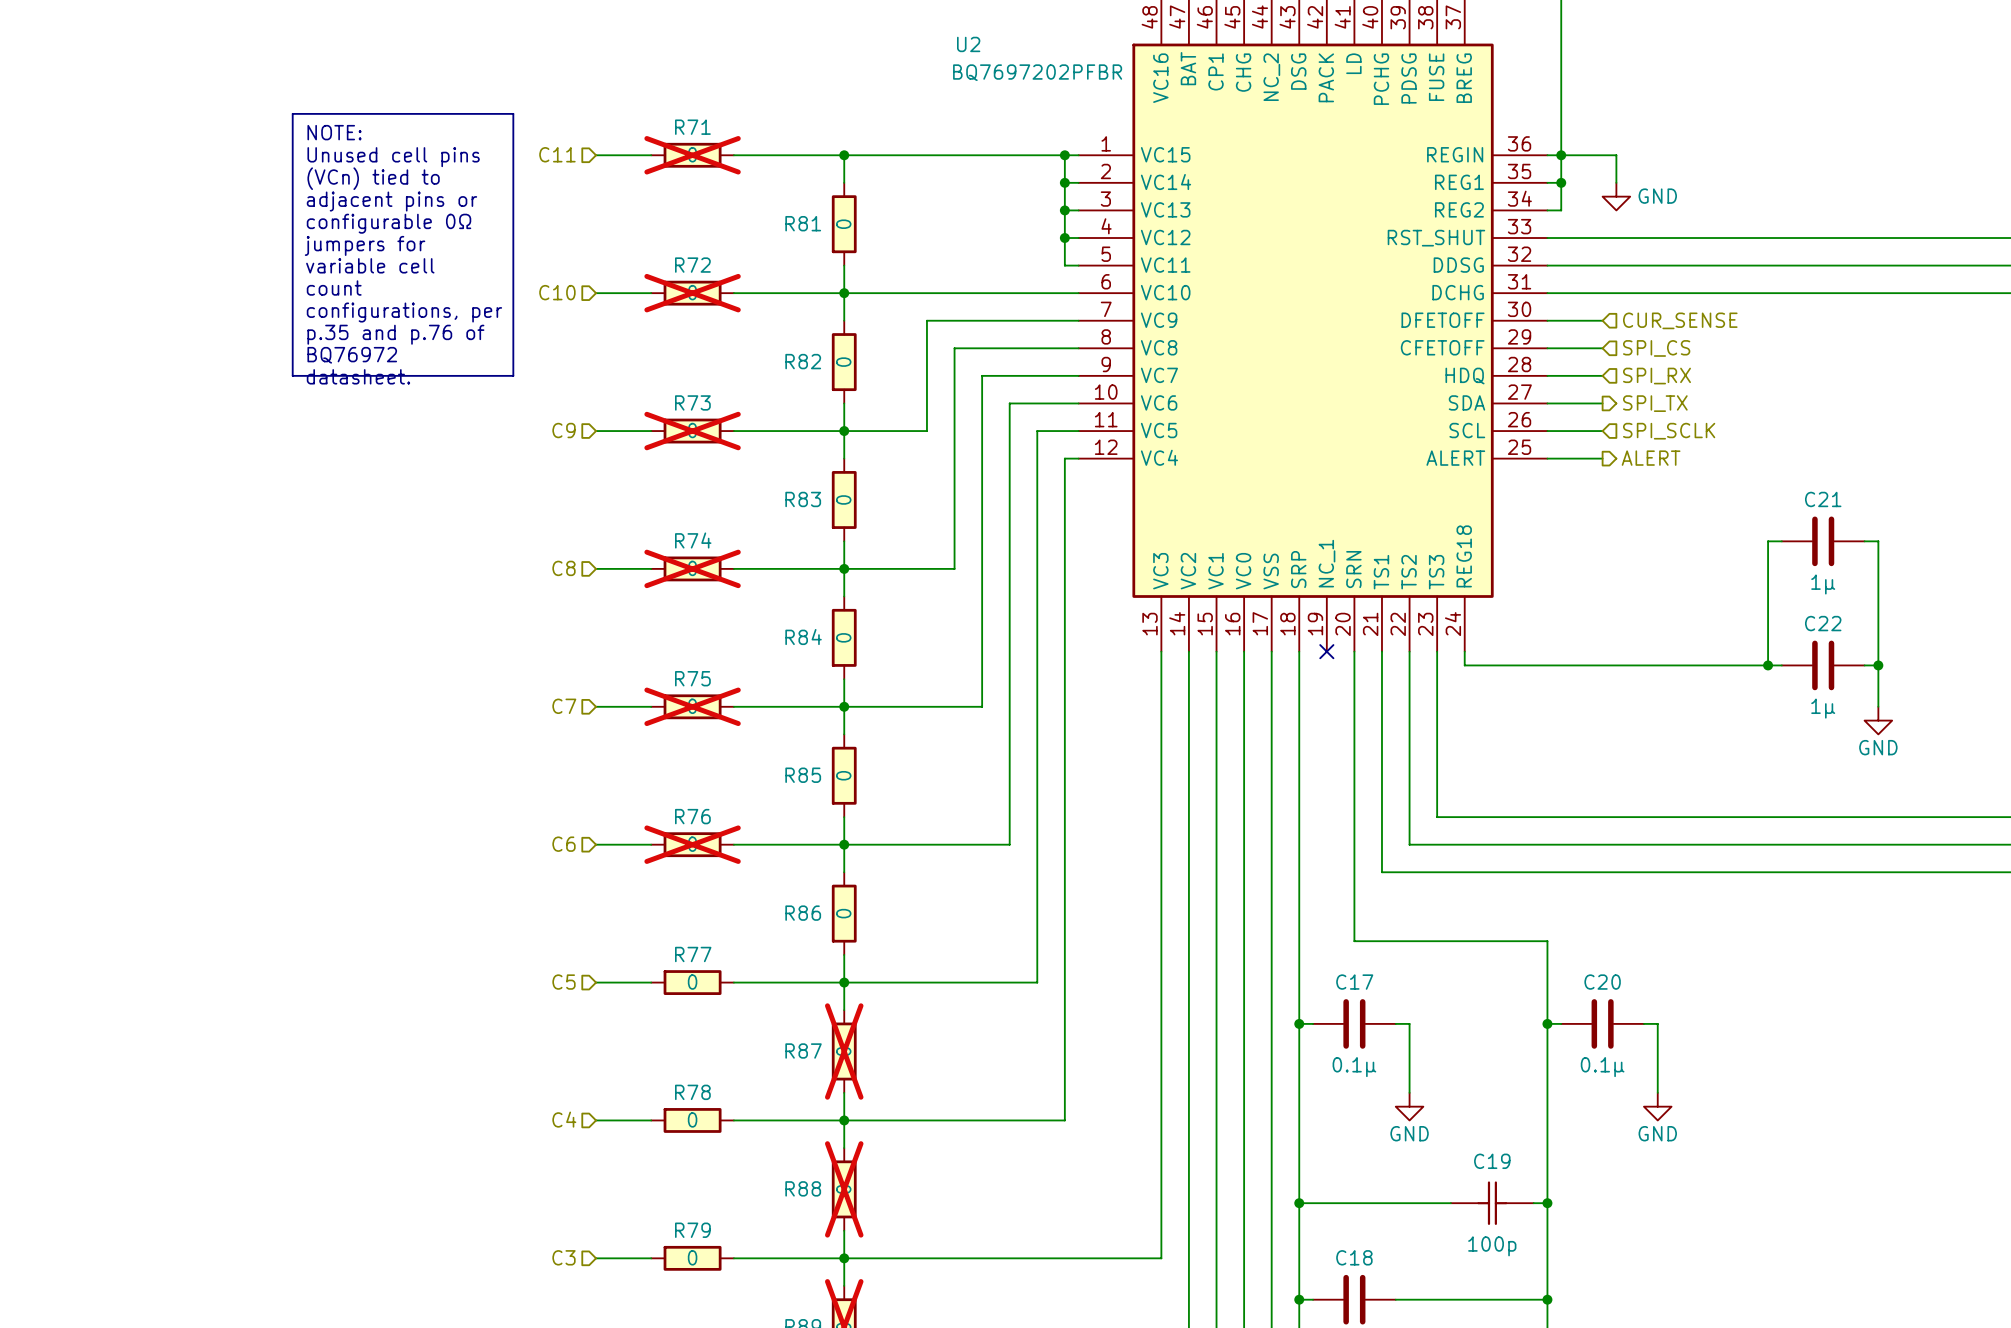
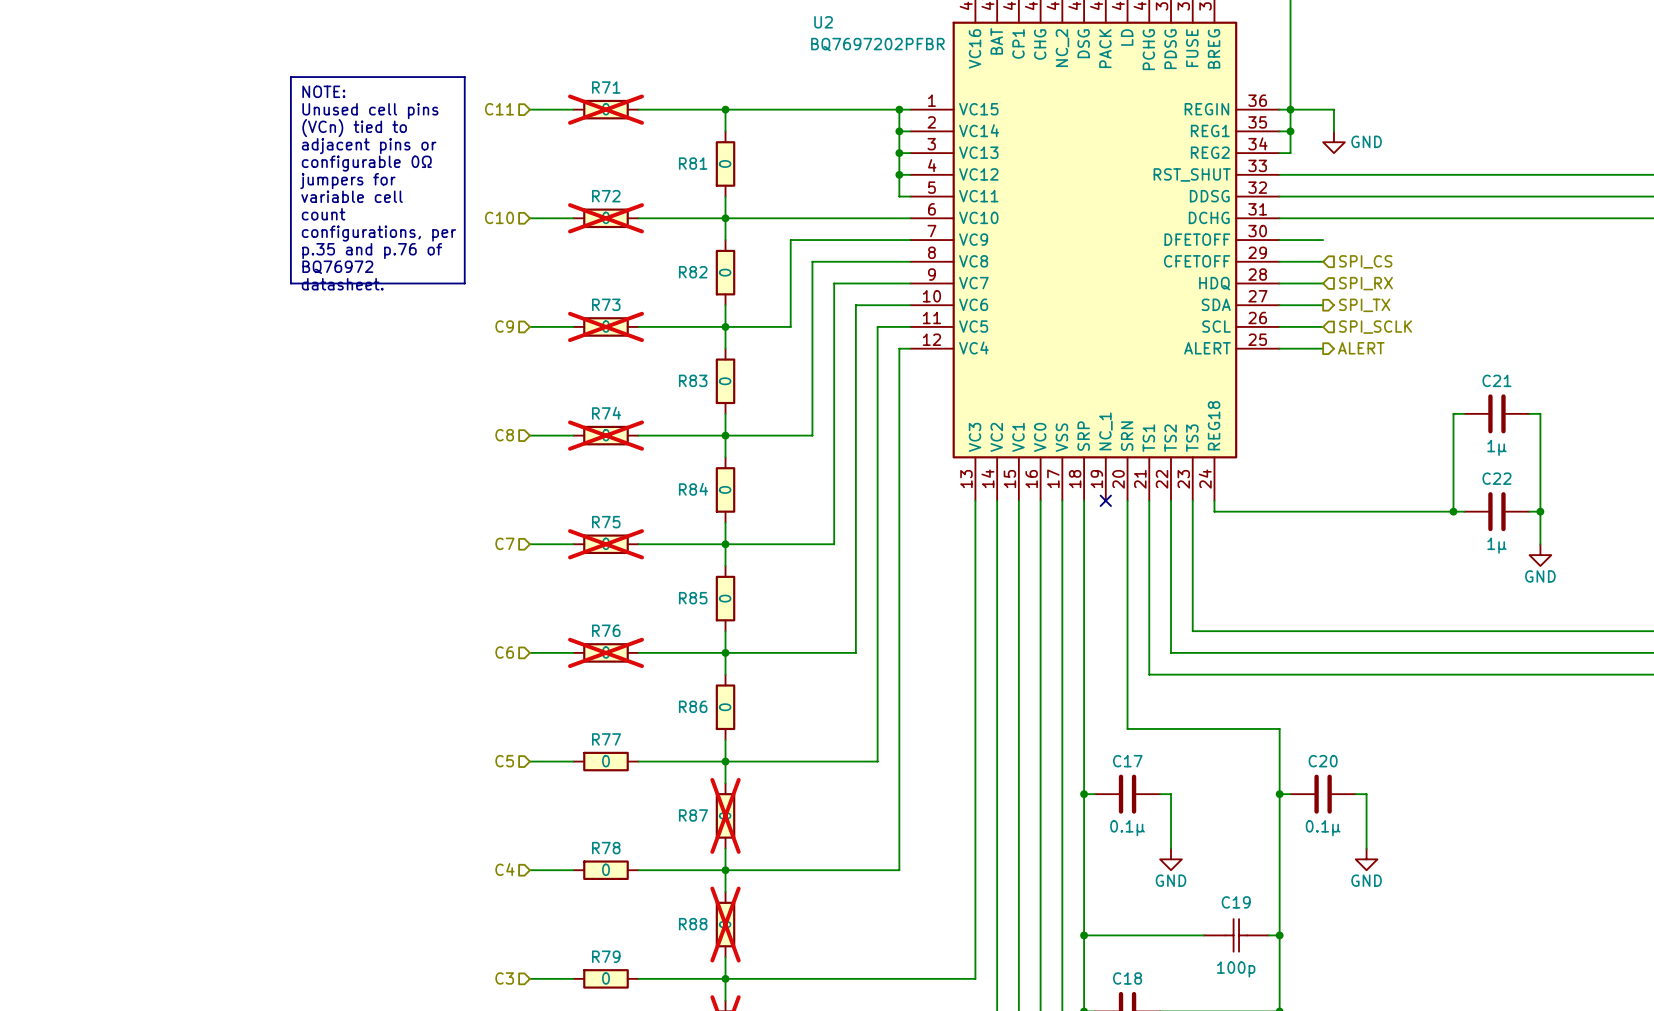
hierarchical label: CUR_SENSE (1680, 320) -> none

